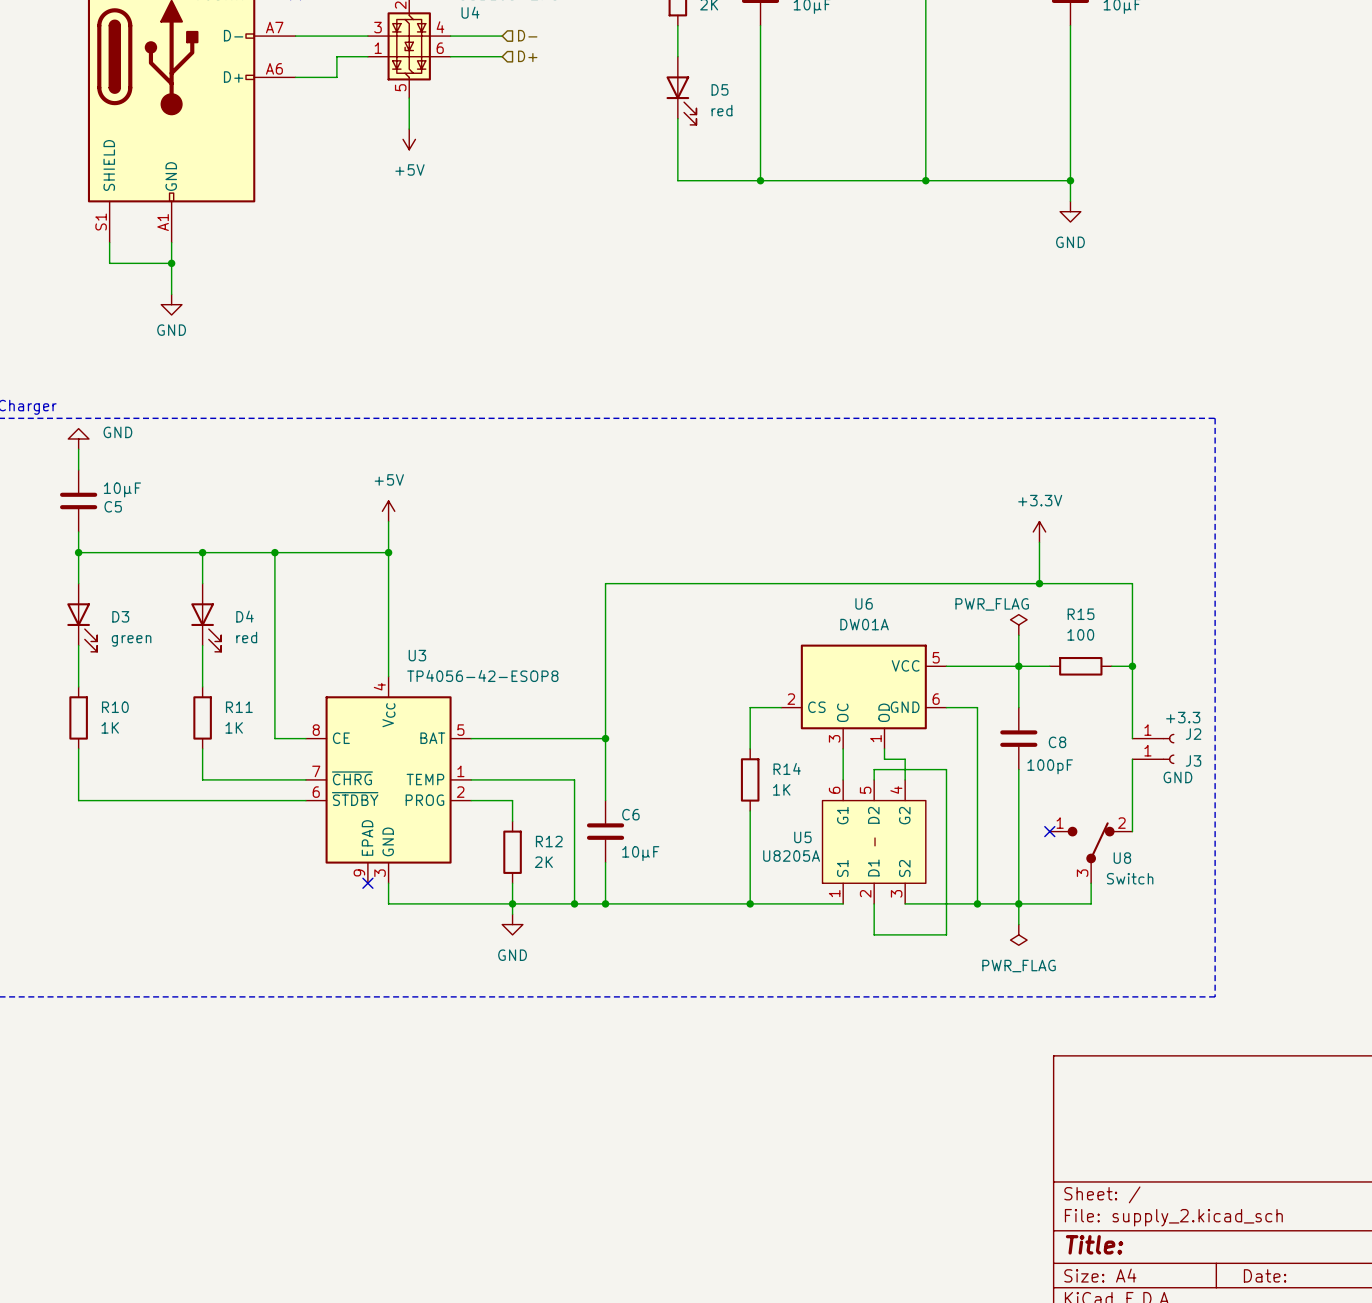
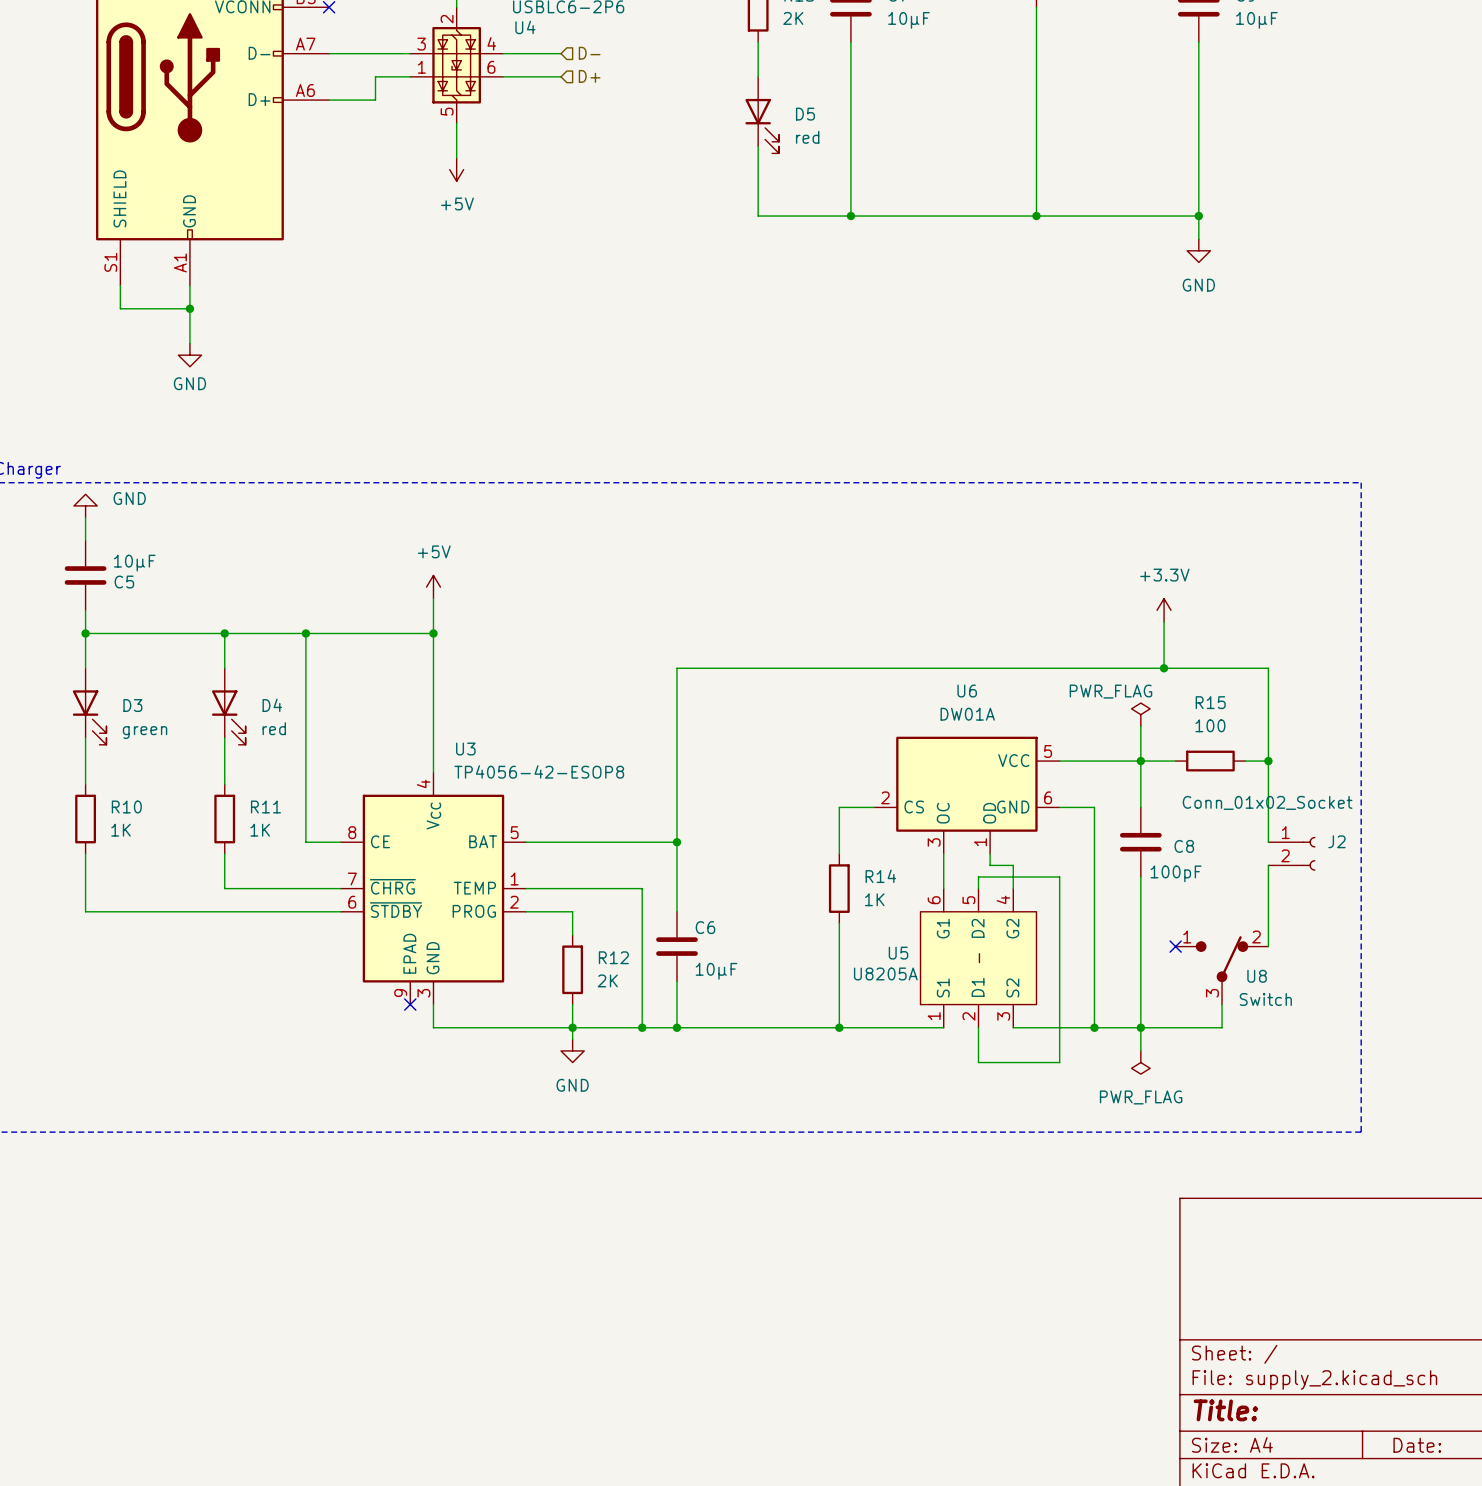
J2 value: +3.3 (1183, 717) -> Conn_01x02_Socket (1267, 802)
J2 symbol: [1132, 733, 1175, 744] -> [1268, 836, 1316, 871]
J3: GND (1153, 759) -> none

